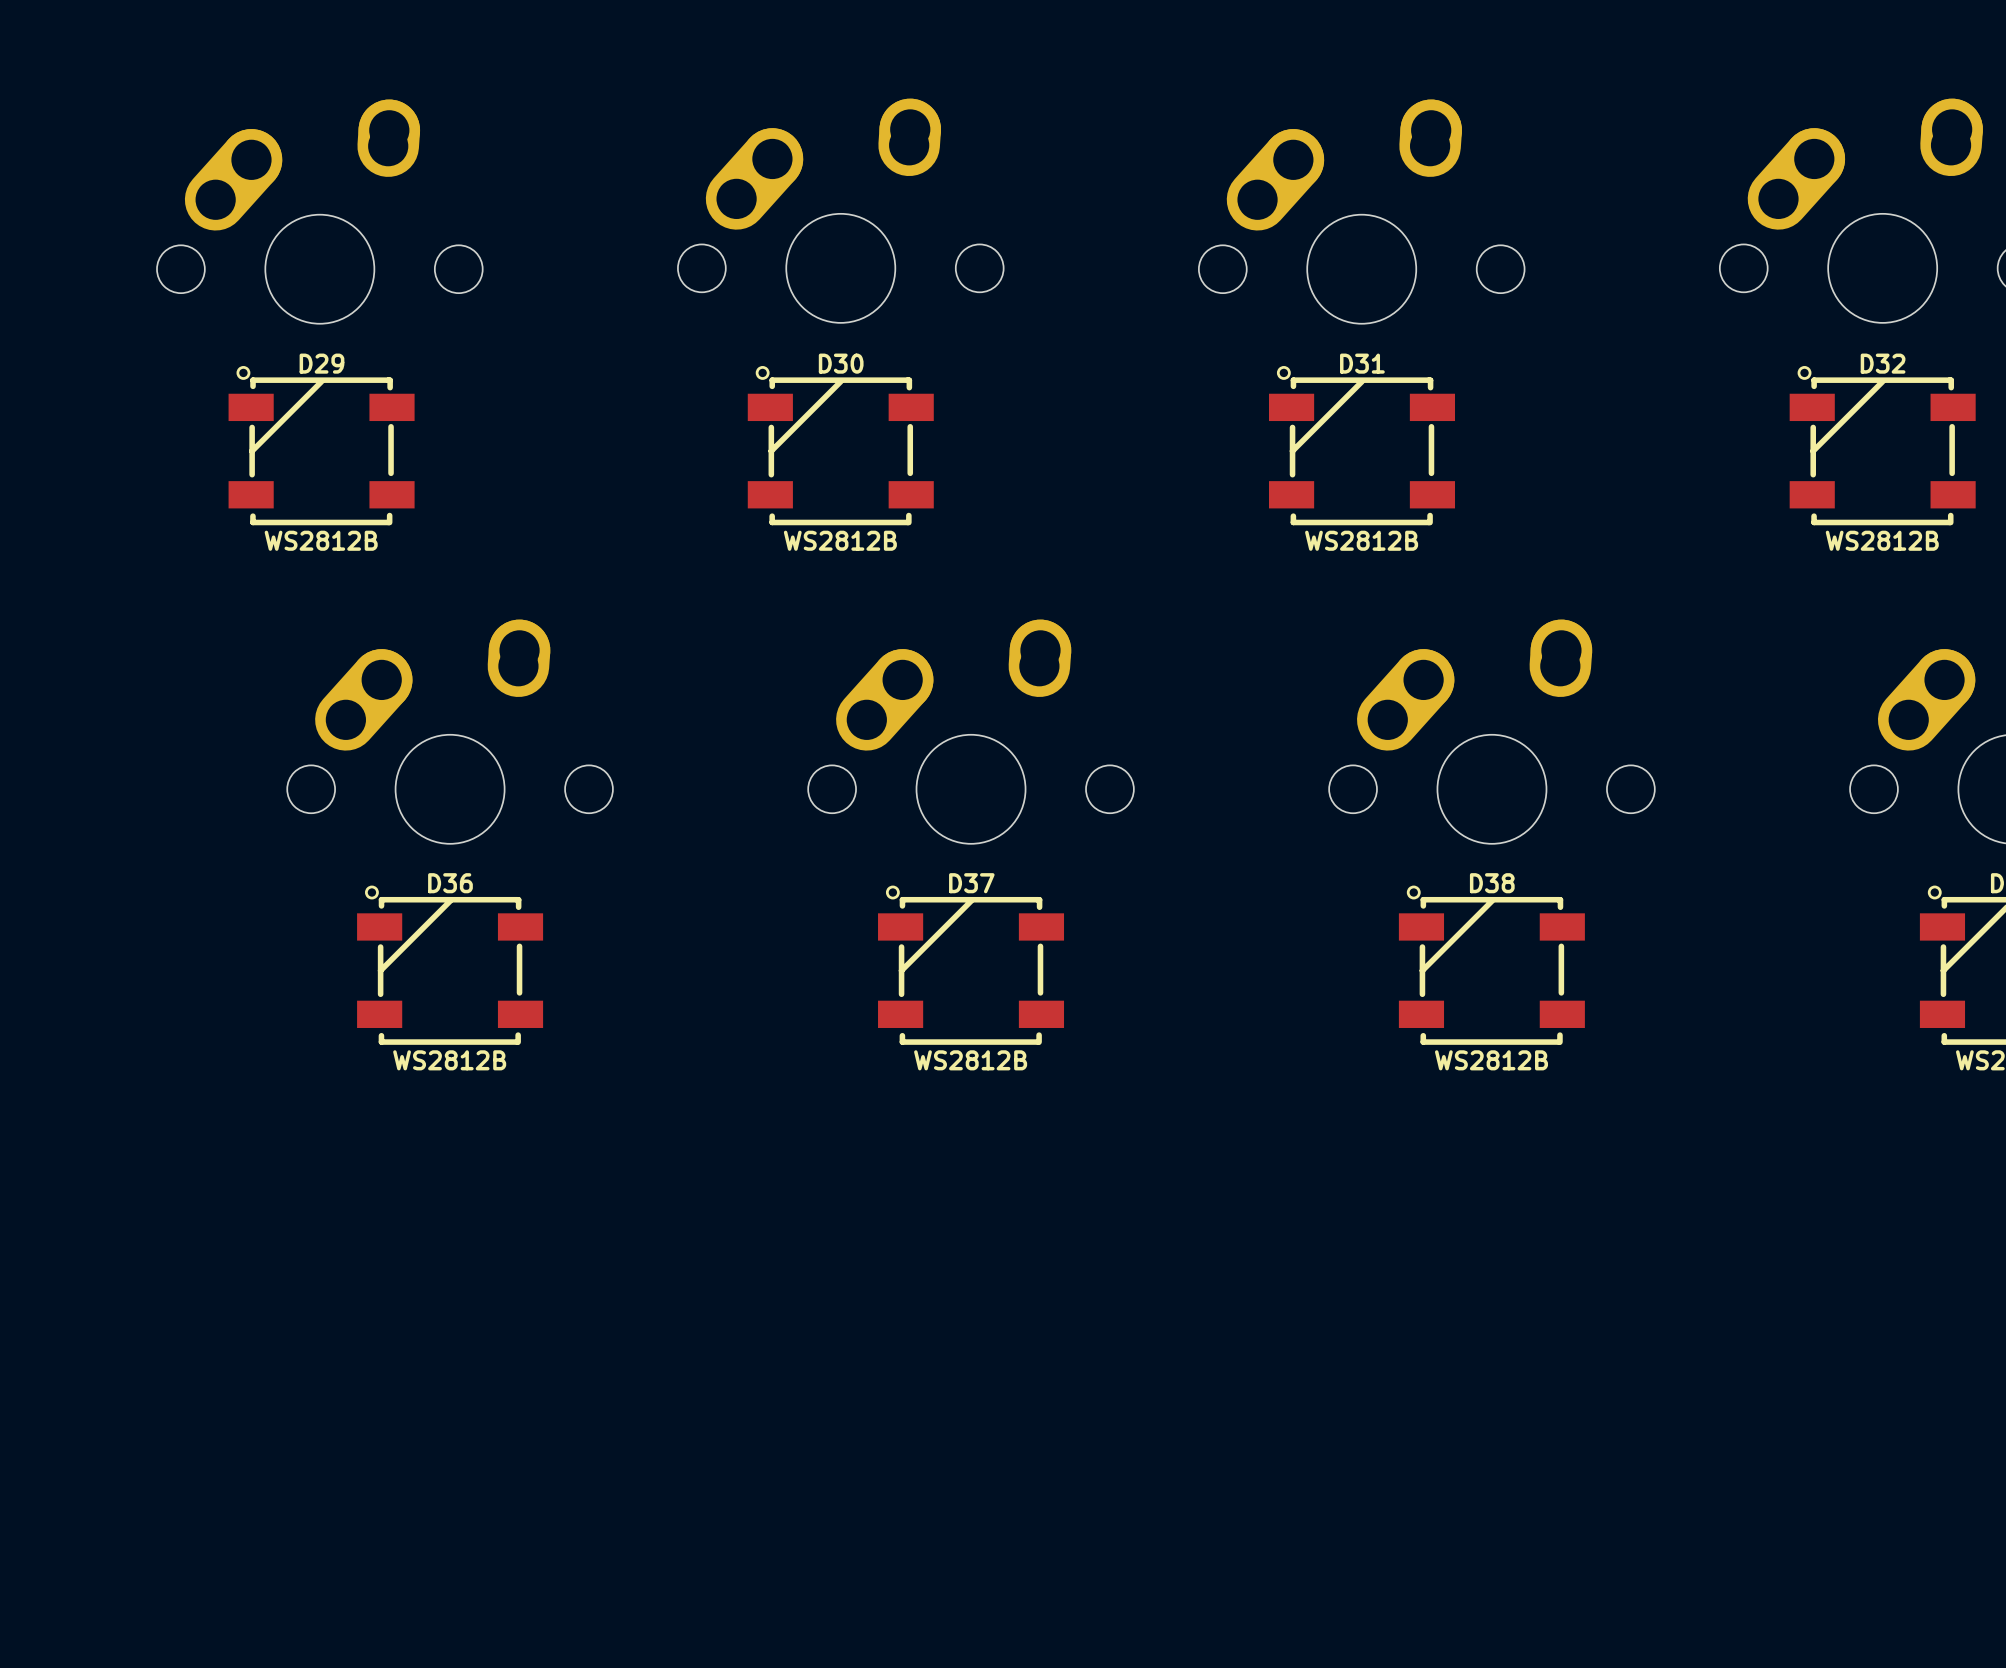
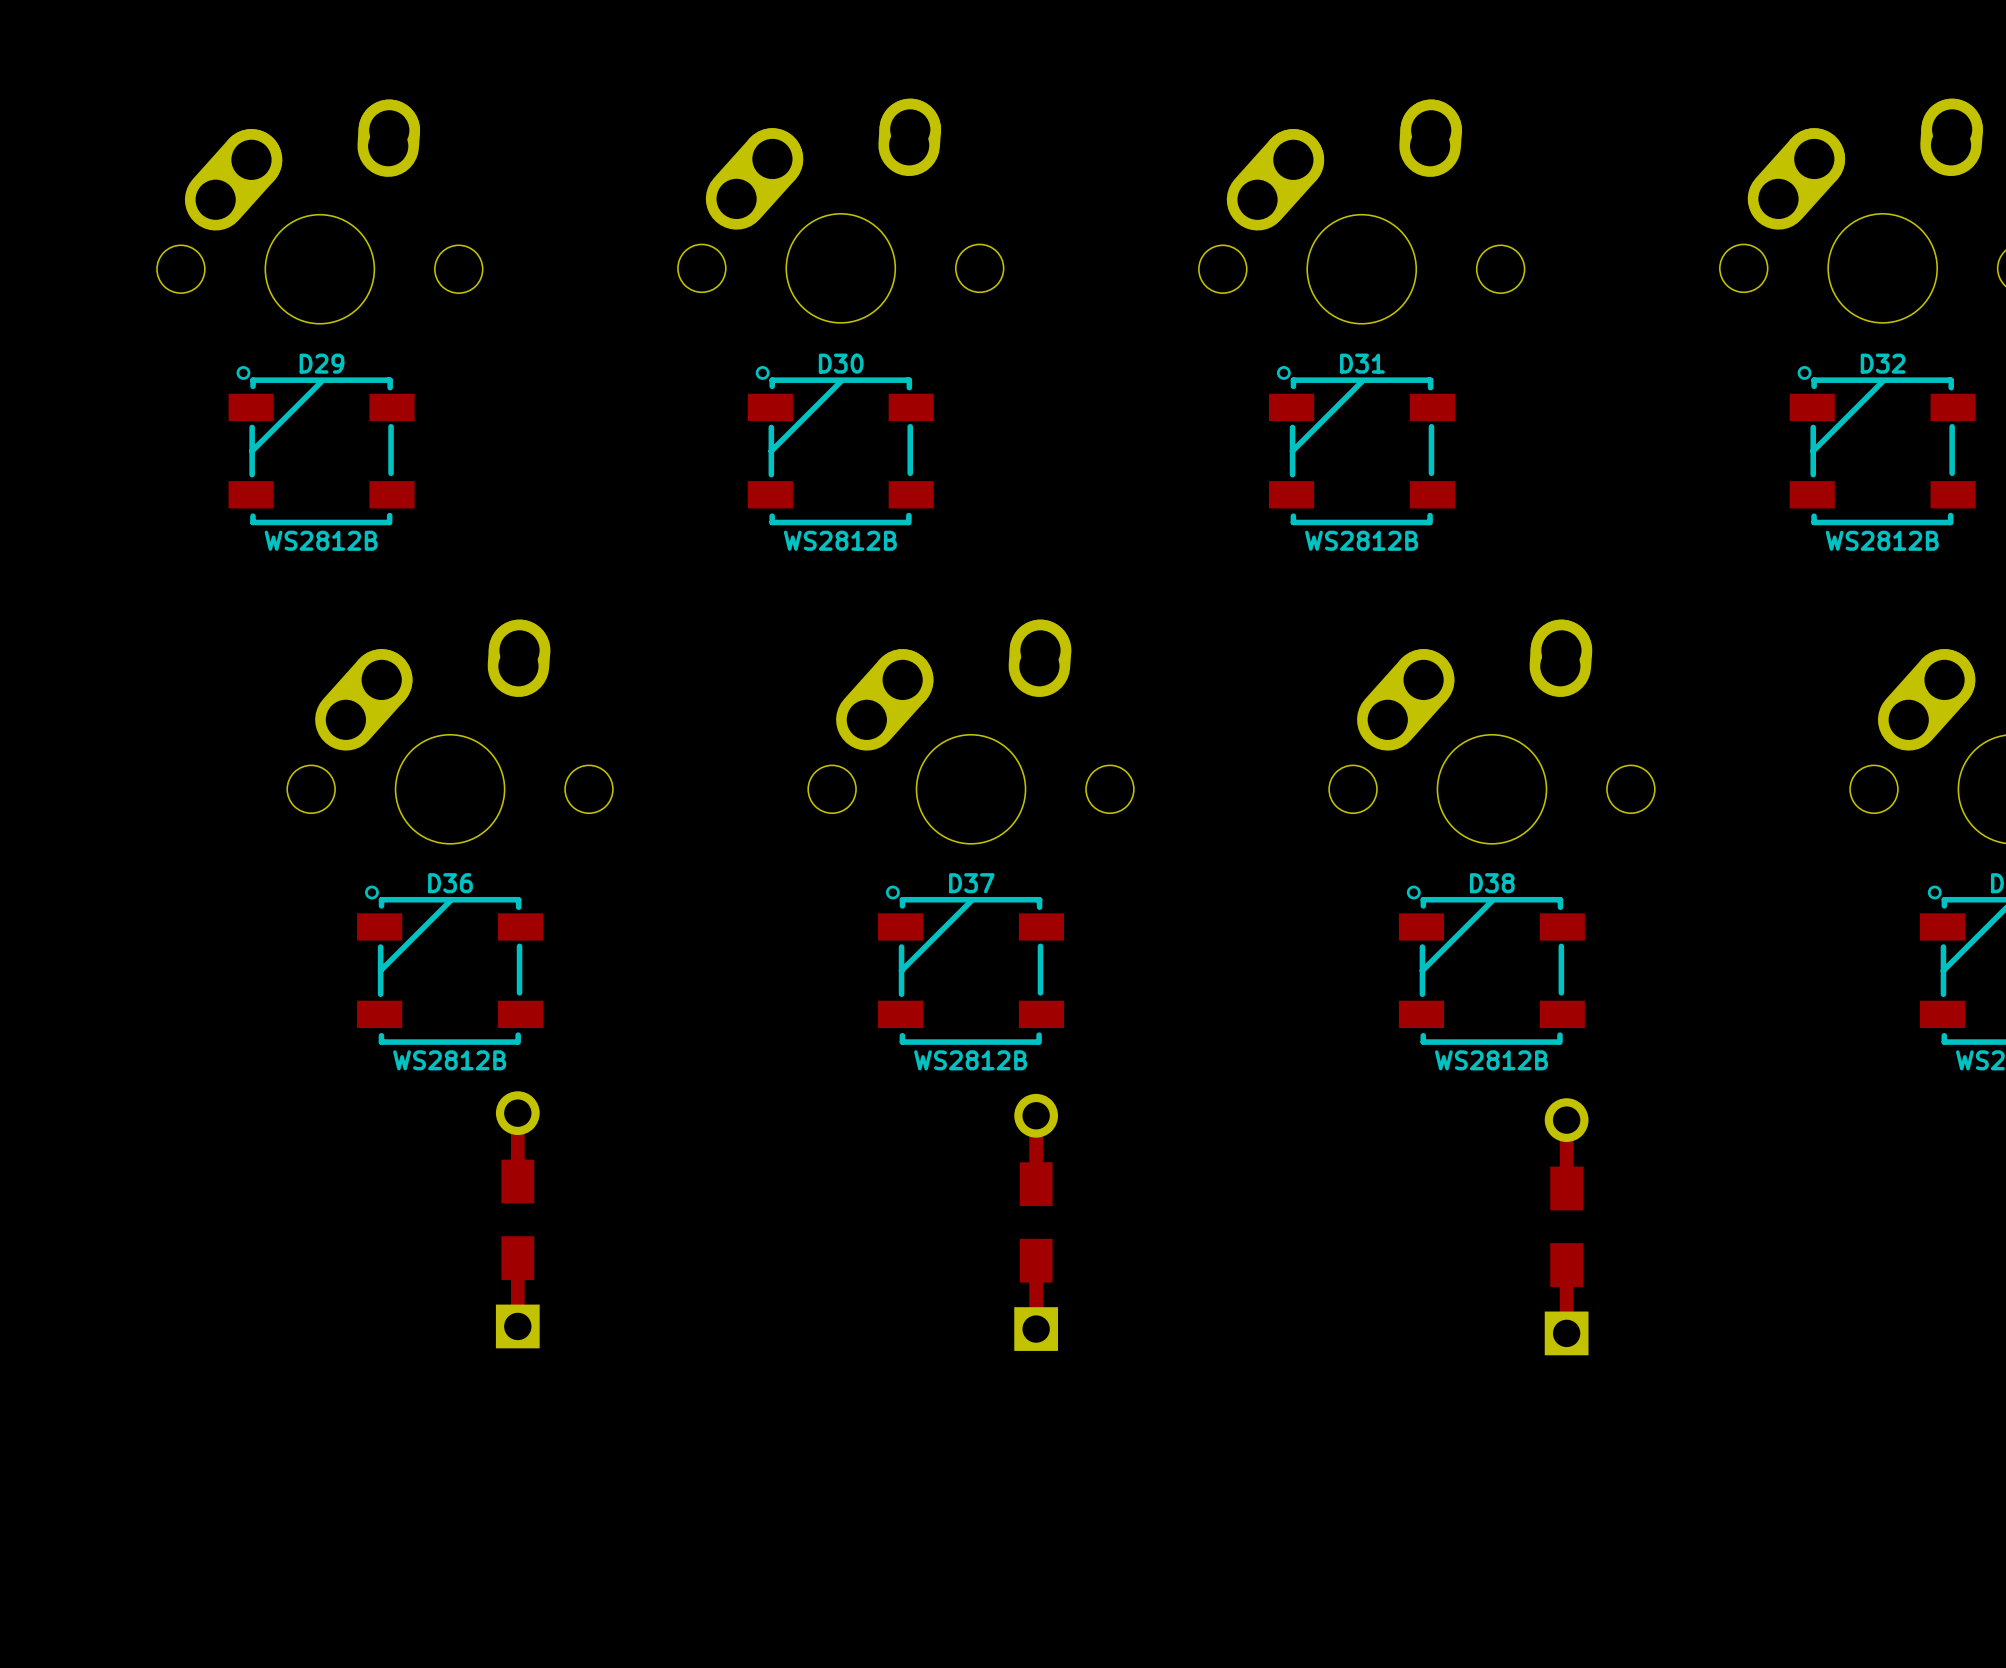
part: none -> (517, 1219)
part: none -> (1036, 1222)
part: none -> (1566, 1226)

